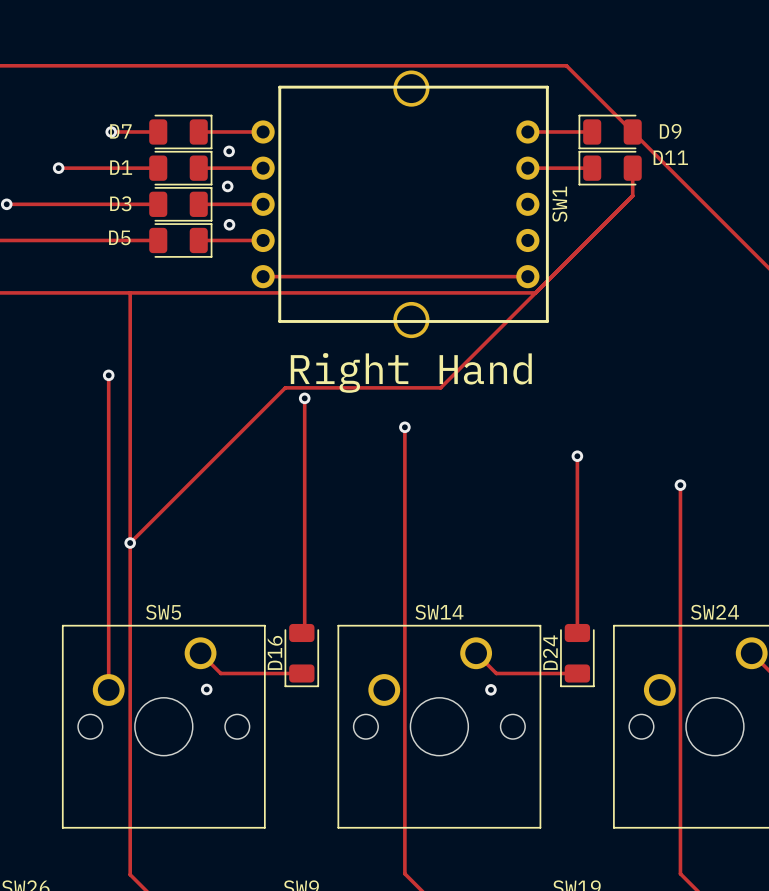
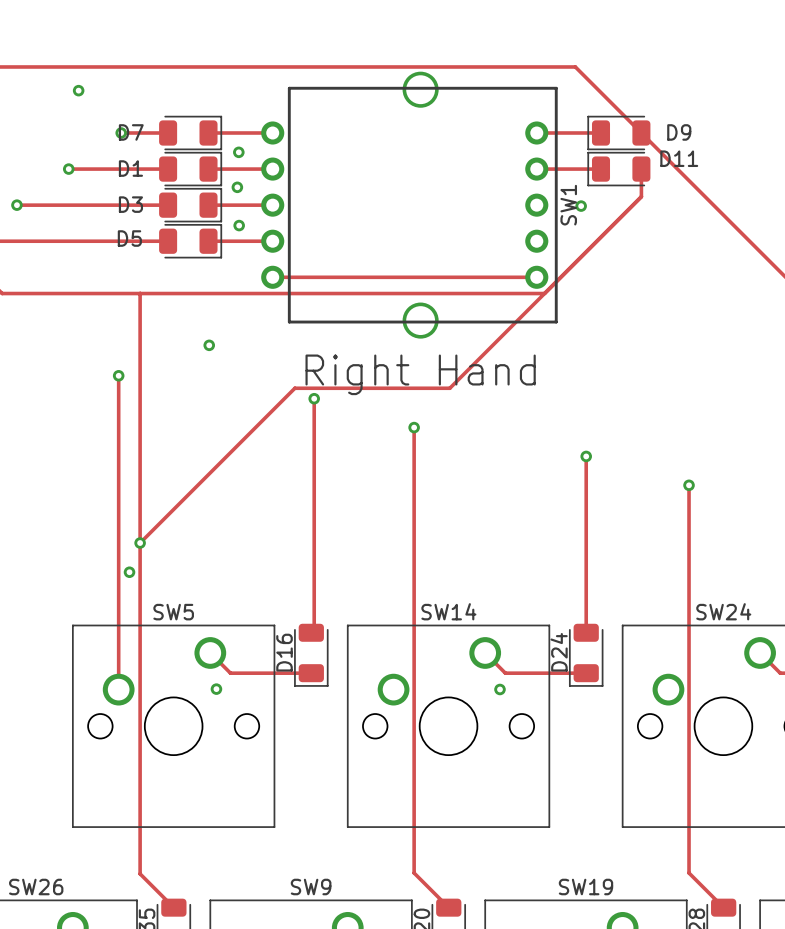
via: none -> (78, 90)
via: none -> (581, 206)
via: none -> (209, 345)
via: none -> (129, 572)

